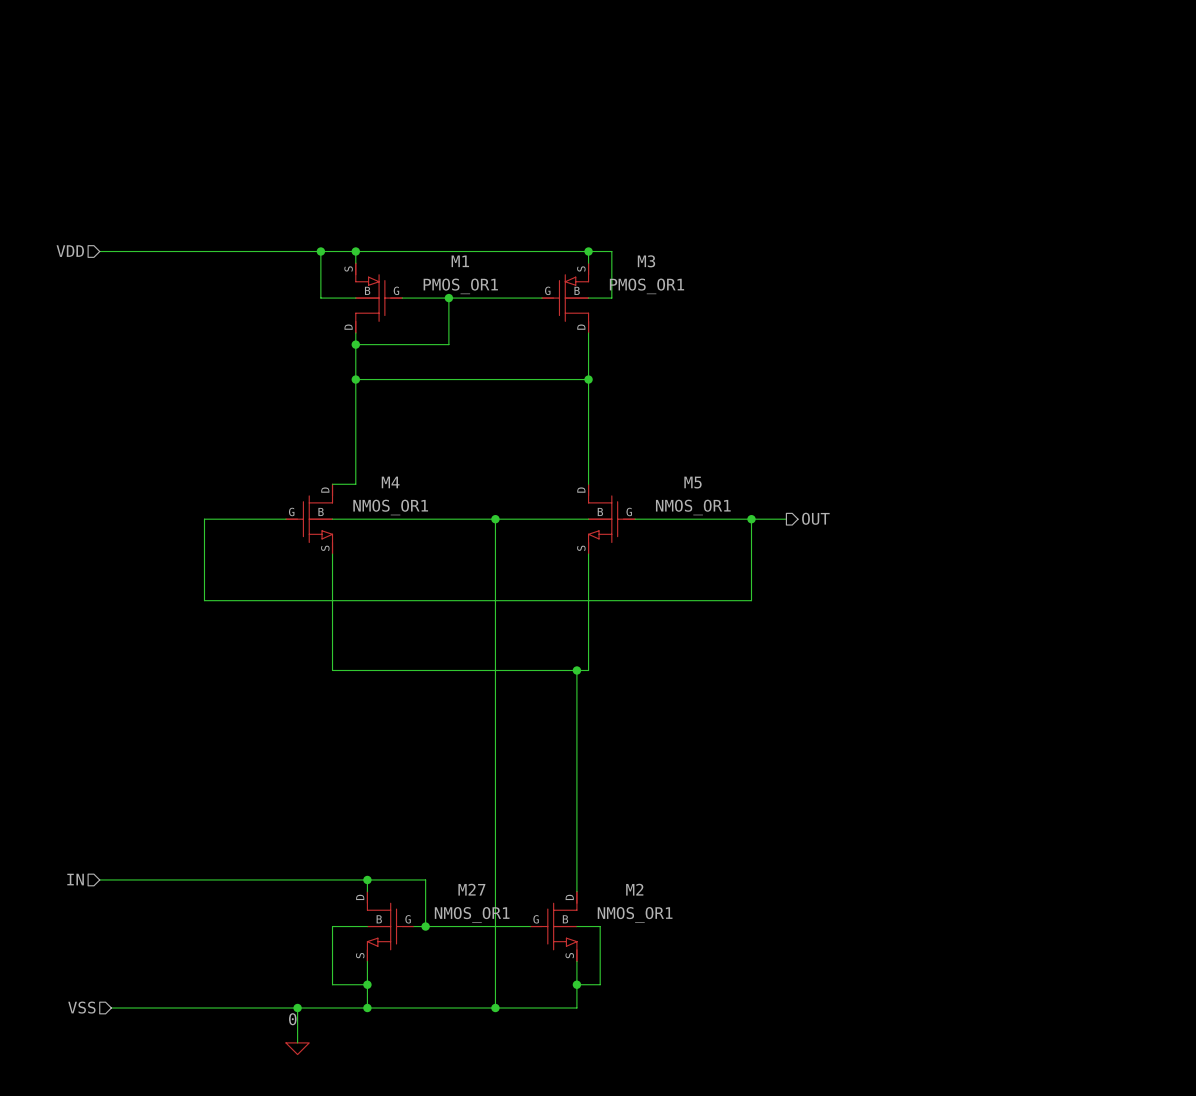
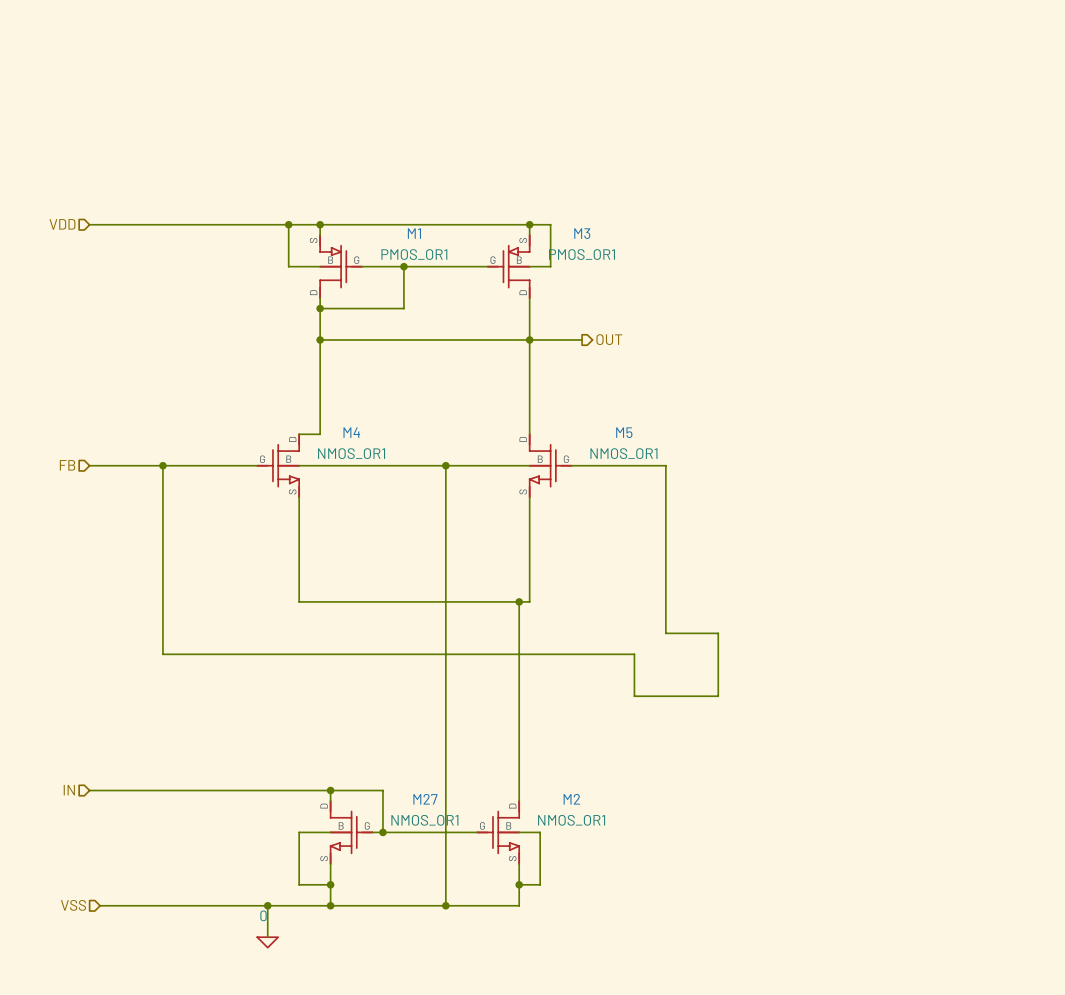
wire: none -> (529, 340) (582, 340)
hierarchical label: none -> FB (67, 465)
hierarchical label position: OUT (815, 518) -> OUT (609, 339)
junction: none -> (162, 465)
wire: (204, 519) (204, 600) (751, 600) (751, 519) -> (183, 465) (89, 465)
wire: (739, 519) (786, 519) -> (665, 465) (665, 633) (718, 633) (718, 696) (634, 696) (634, 654) (162, 654) (162, 465)
junction: (751, 519) -> none

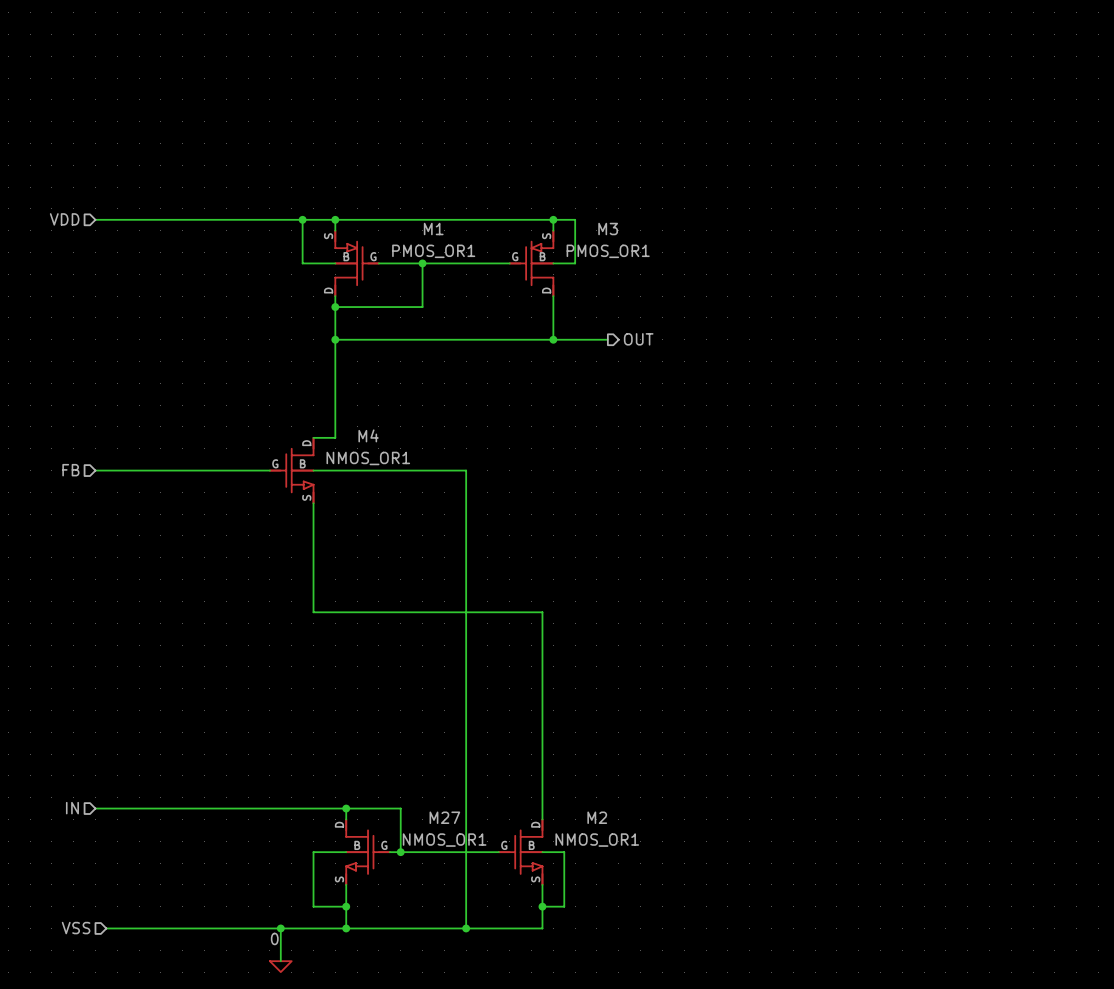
wire: (529, 340) (529, 434) -> none
wire: (162, 465) (162, 654) (634, 654) (634, 696) (718, 696) (718, 633) (665, 633) (665, 465) (571, 465) -> none
junction: (162, 465) -> none
wire: (445, 465) (529, 465) -> none
junction: (445, 465) -> none
M5: NMOS_OR1 (550, 465) -> none
wire: (529, 497) (529, 601) (519, 601) -> none
junction: (519, 601) -> none

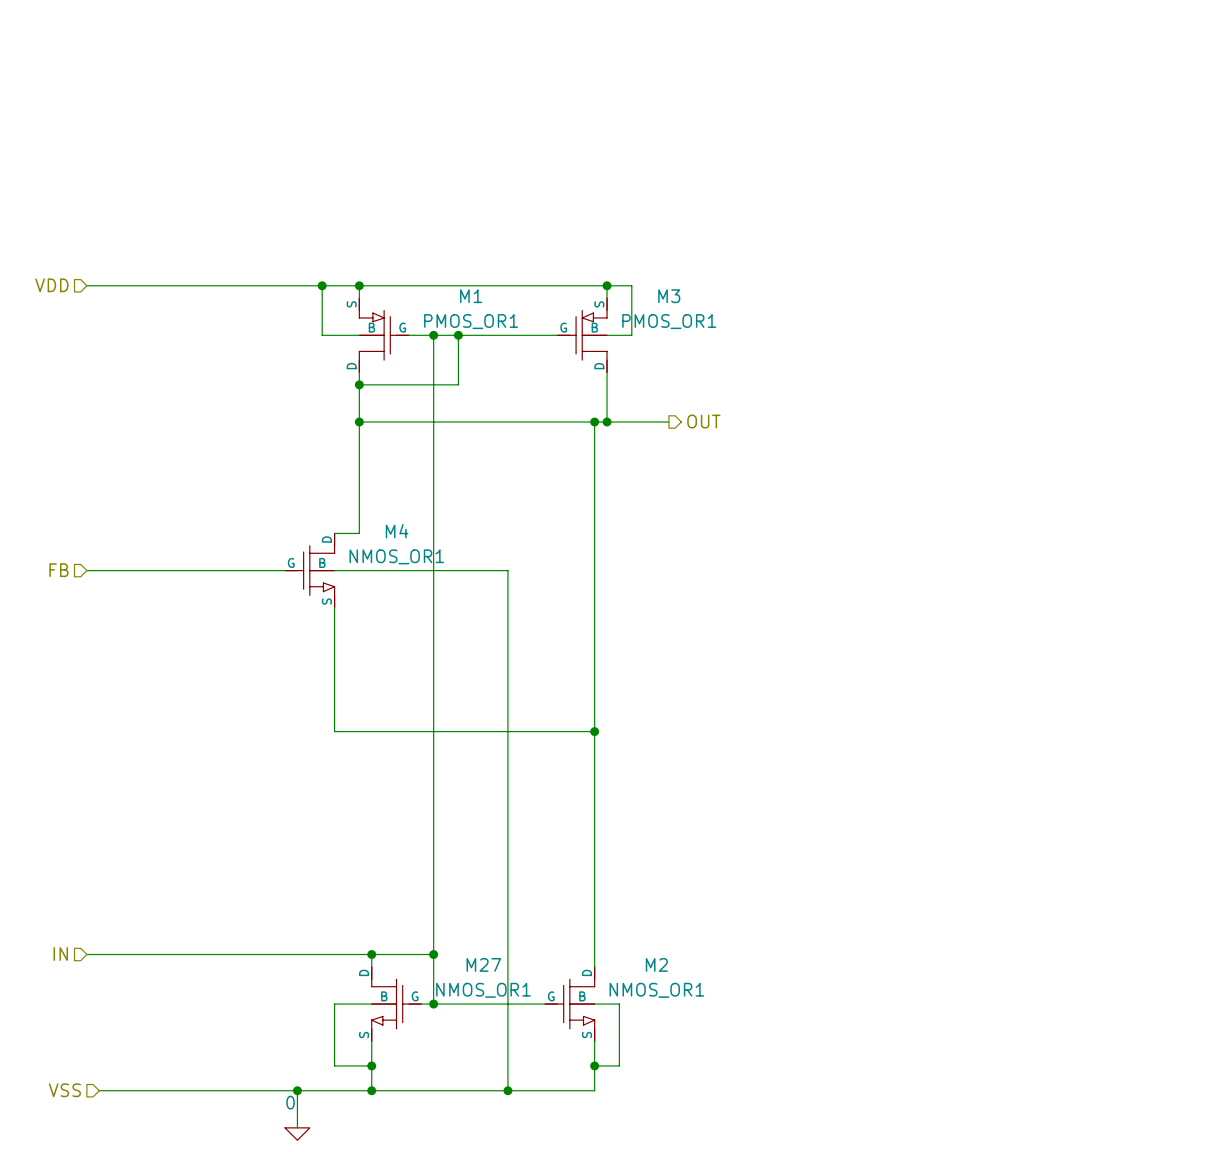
wire: none -> (433, 335) (433, 954)
junction: none -> (433, 335)
wire: none -> (594, 422) (594, 731)
junction: none -> (594, 422)
junction: none -> (594, 731)
junction: none -> (433, 954)

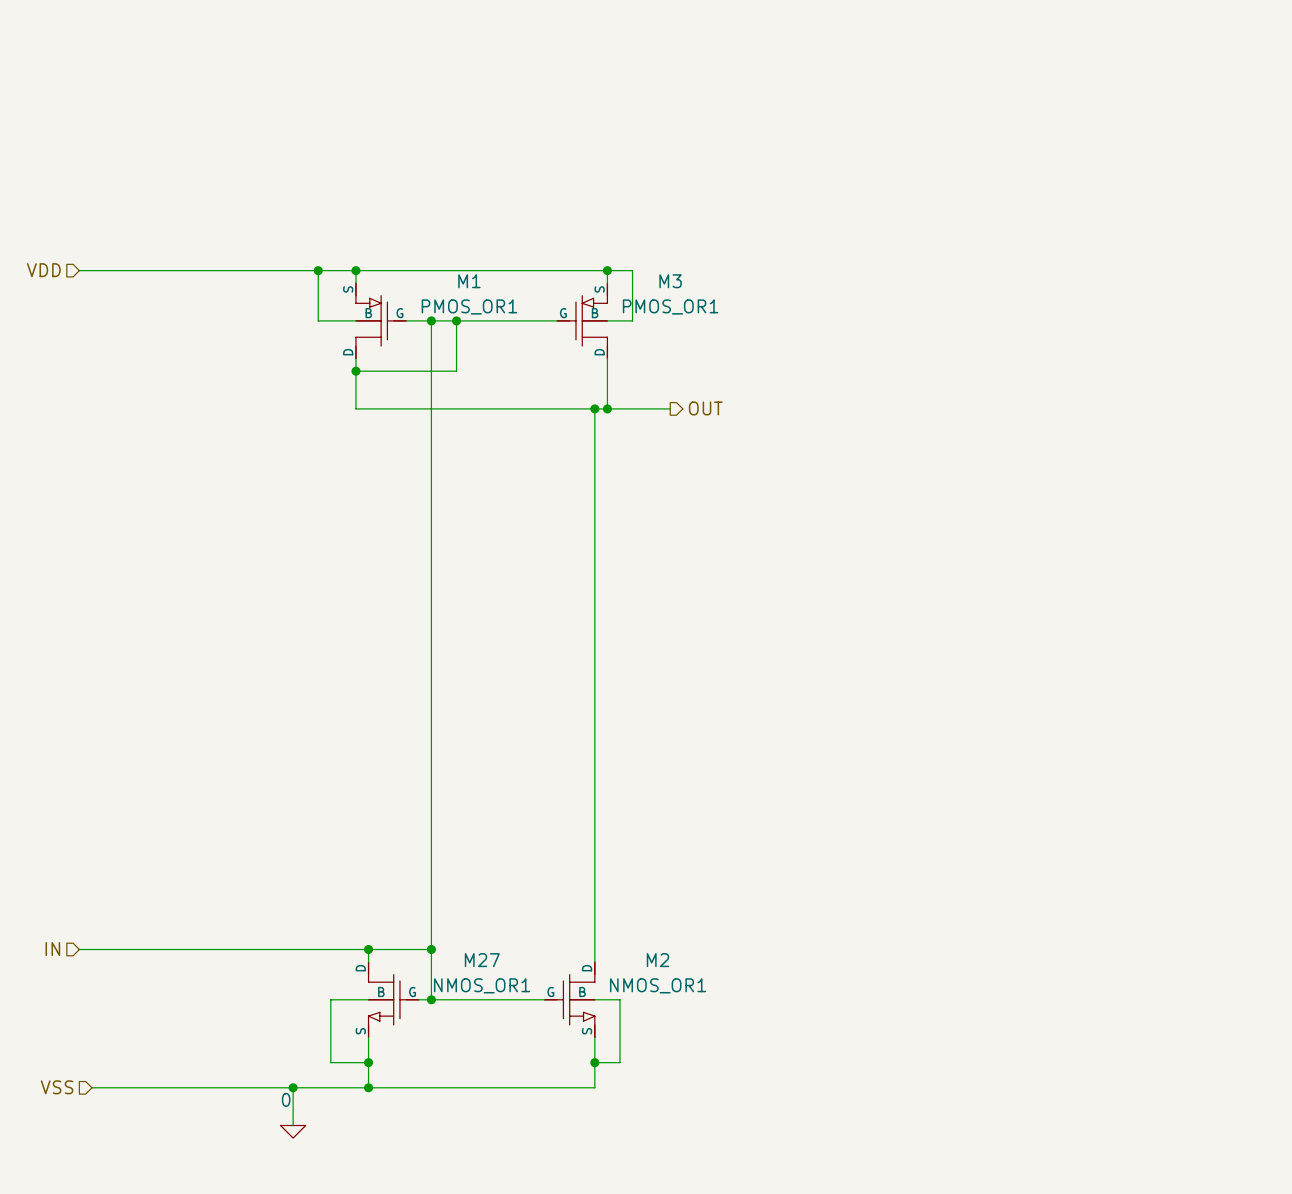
wire: (359, 422) (359, 533) (334, 533) -> none
junction: (359, 422) -> none
hierarchical label: FB (58, 570) -> none
wire: (86, 570) (285, 570) -> none
M4: NMOS_OR1 (309, 570) -> none
wire: (334, 570) (507, 570) (507, 1090) -> none
wire: (334, 607) (334, 731) (594, 731) -> none
junction: (594, 731) -> none
junction: (507, 1090) -> none

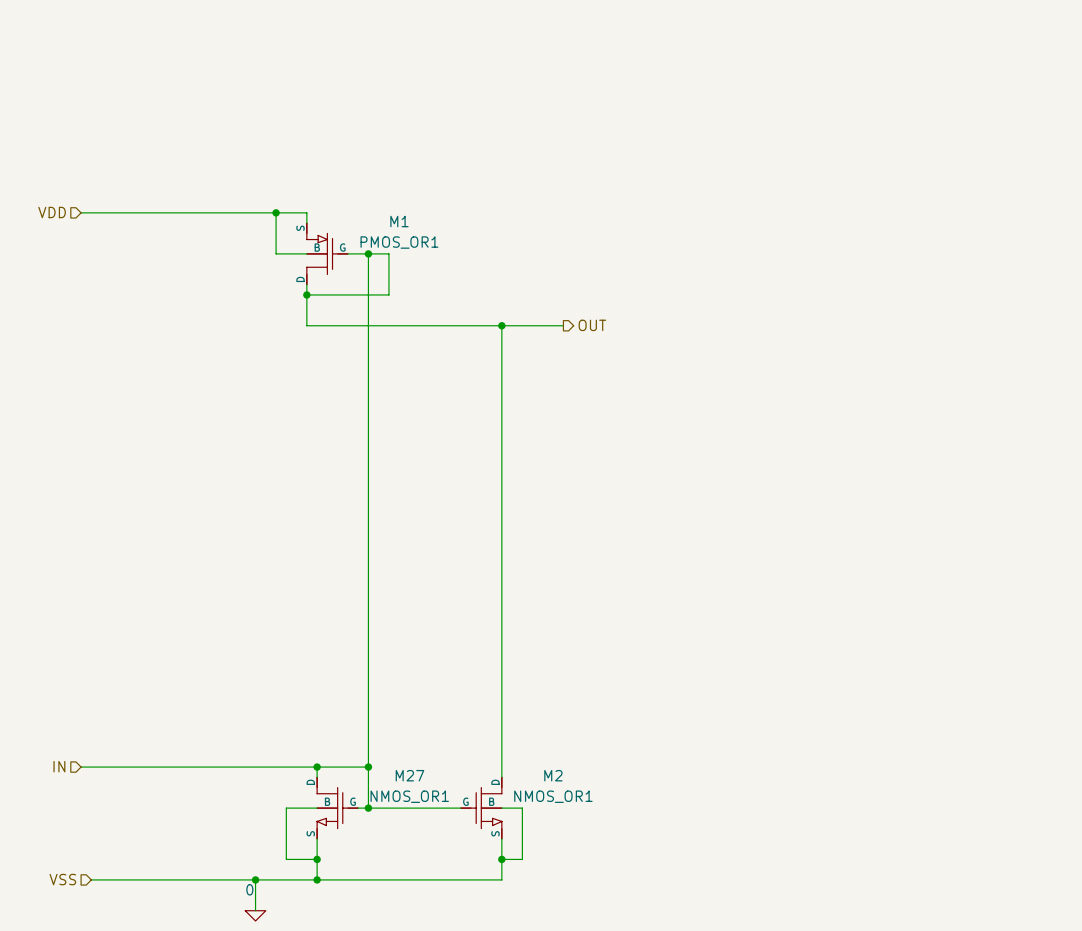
wire: (355, 270) (632, 270) (632, 320) (607, 320) -> none
junction: (355, 270) -> none
wire: (607, 270) (607, 283) -> none
junction: (607, 270) -> none
wire: (456, 320) (557, 320) -> none
junction: (456, 320) -> none
M3: PMOS_OR1 (582, 320) -> none
wire: (607, 358) (607, 408) -> none
junction: (607, 408) -> none

